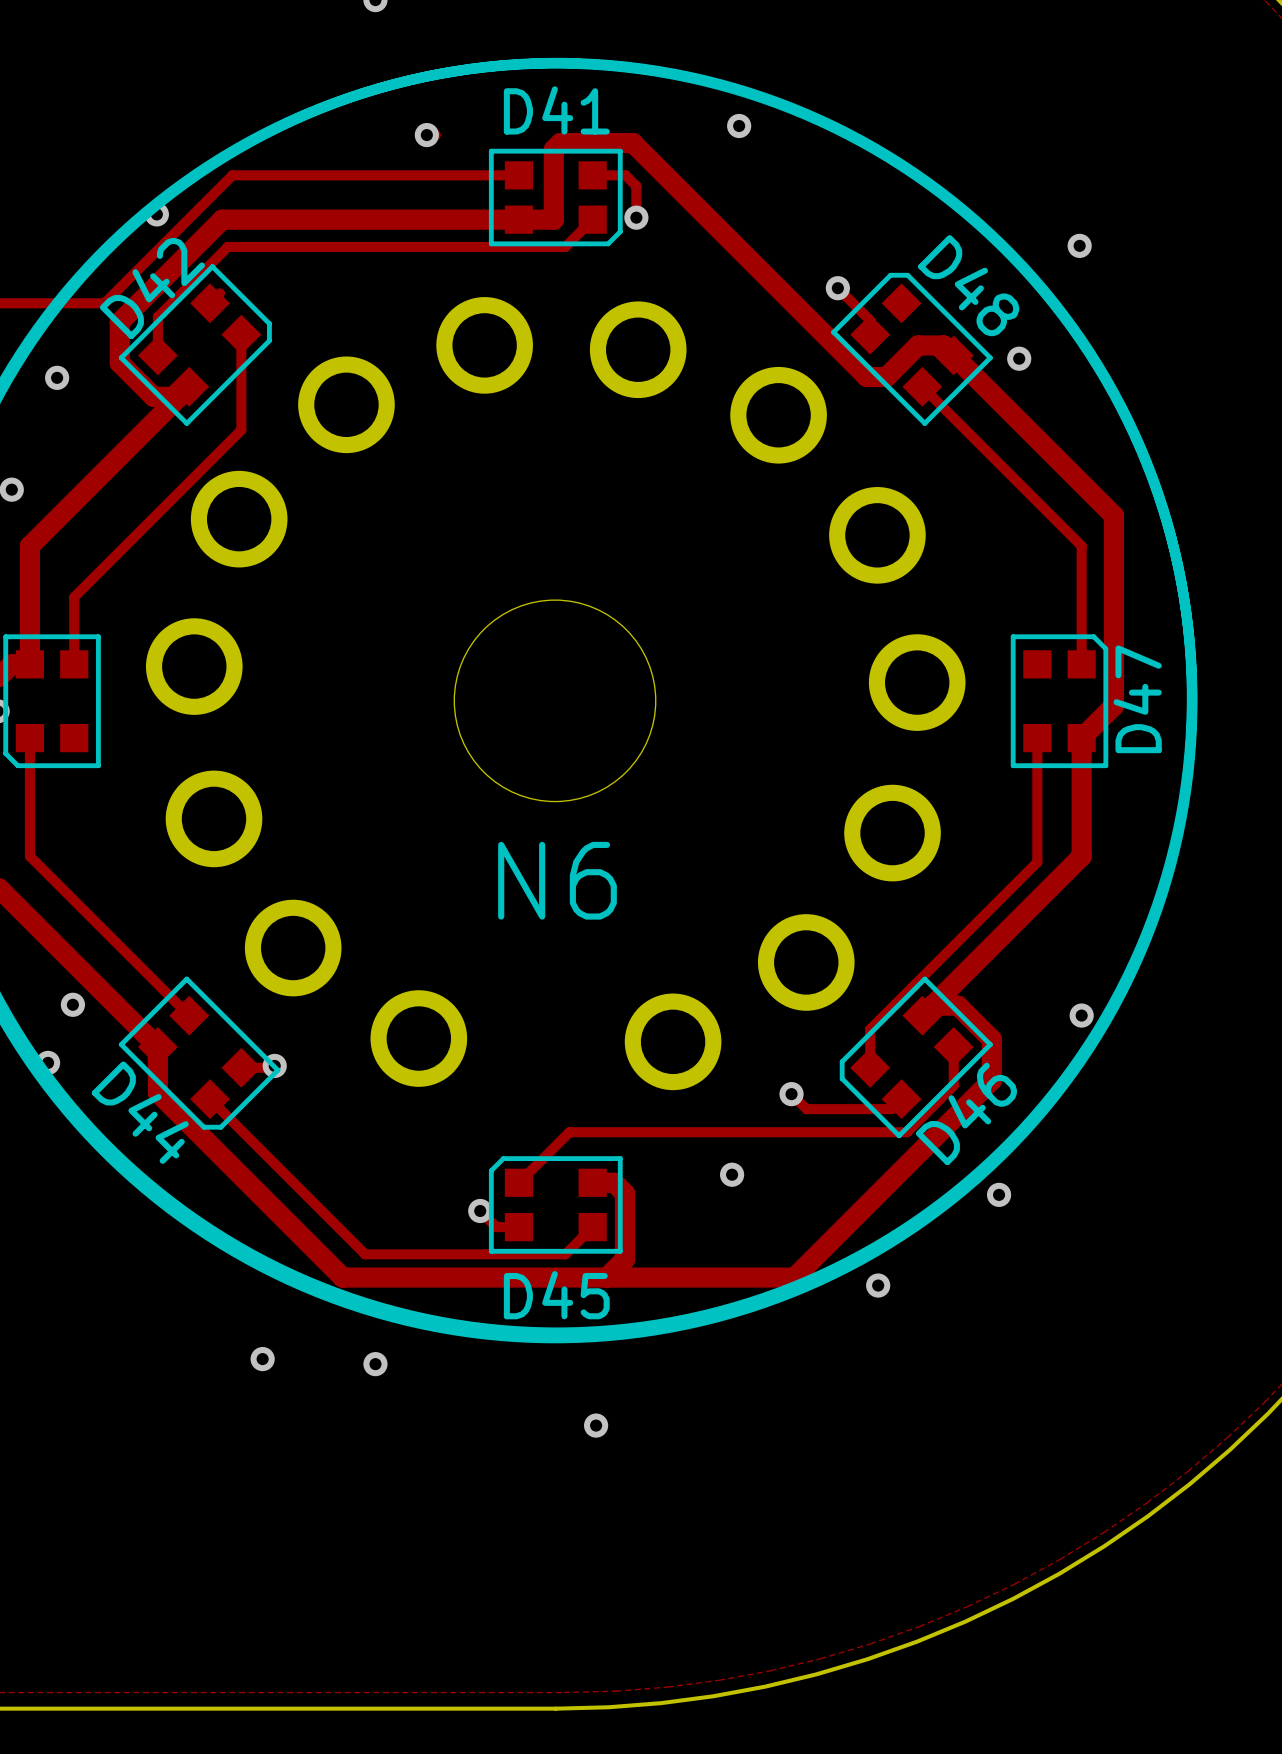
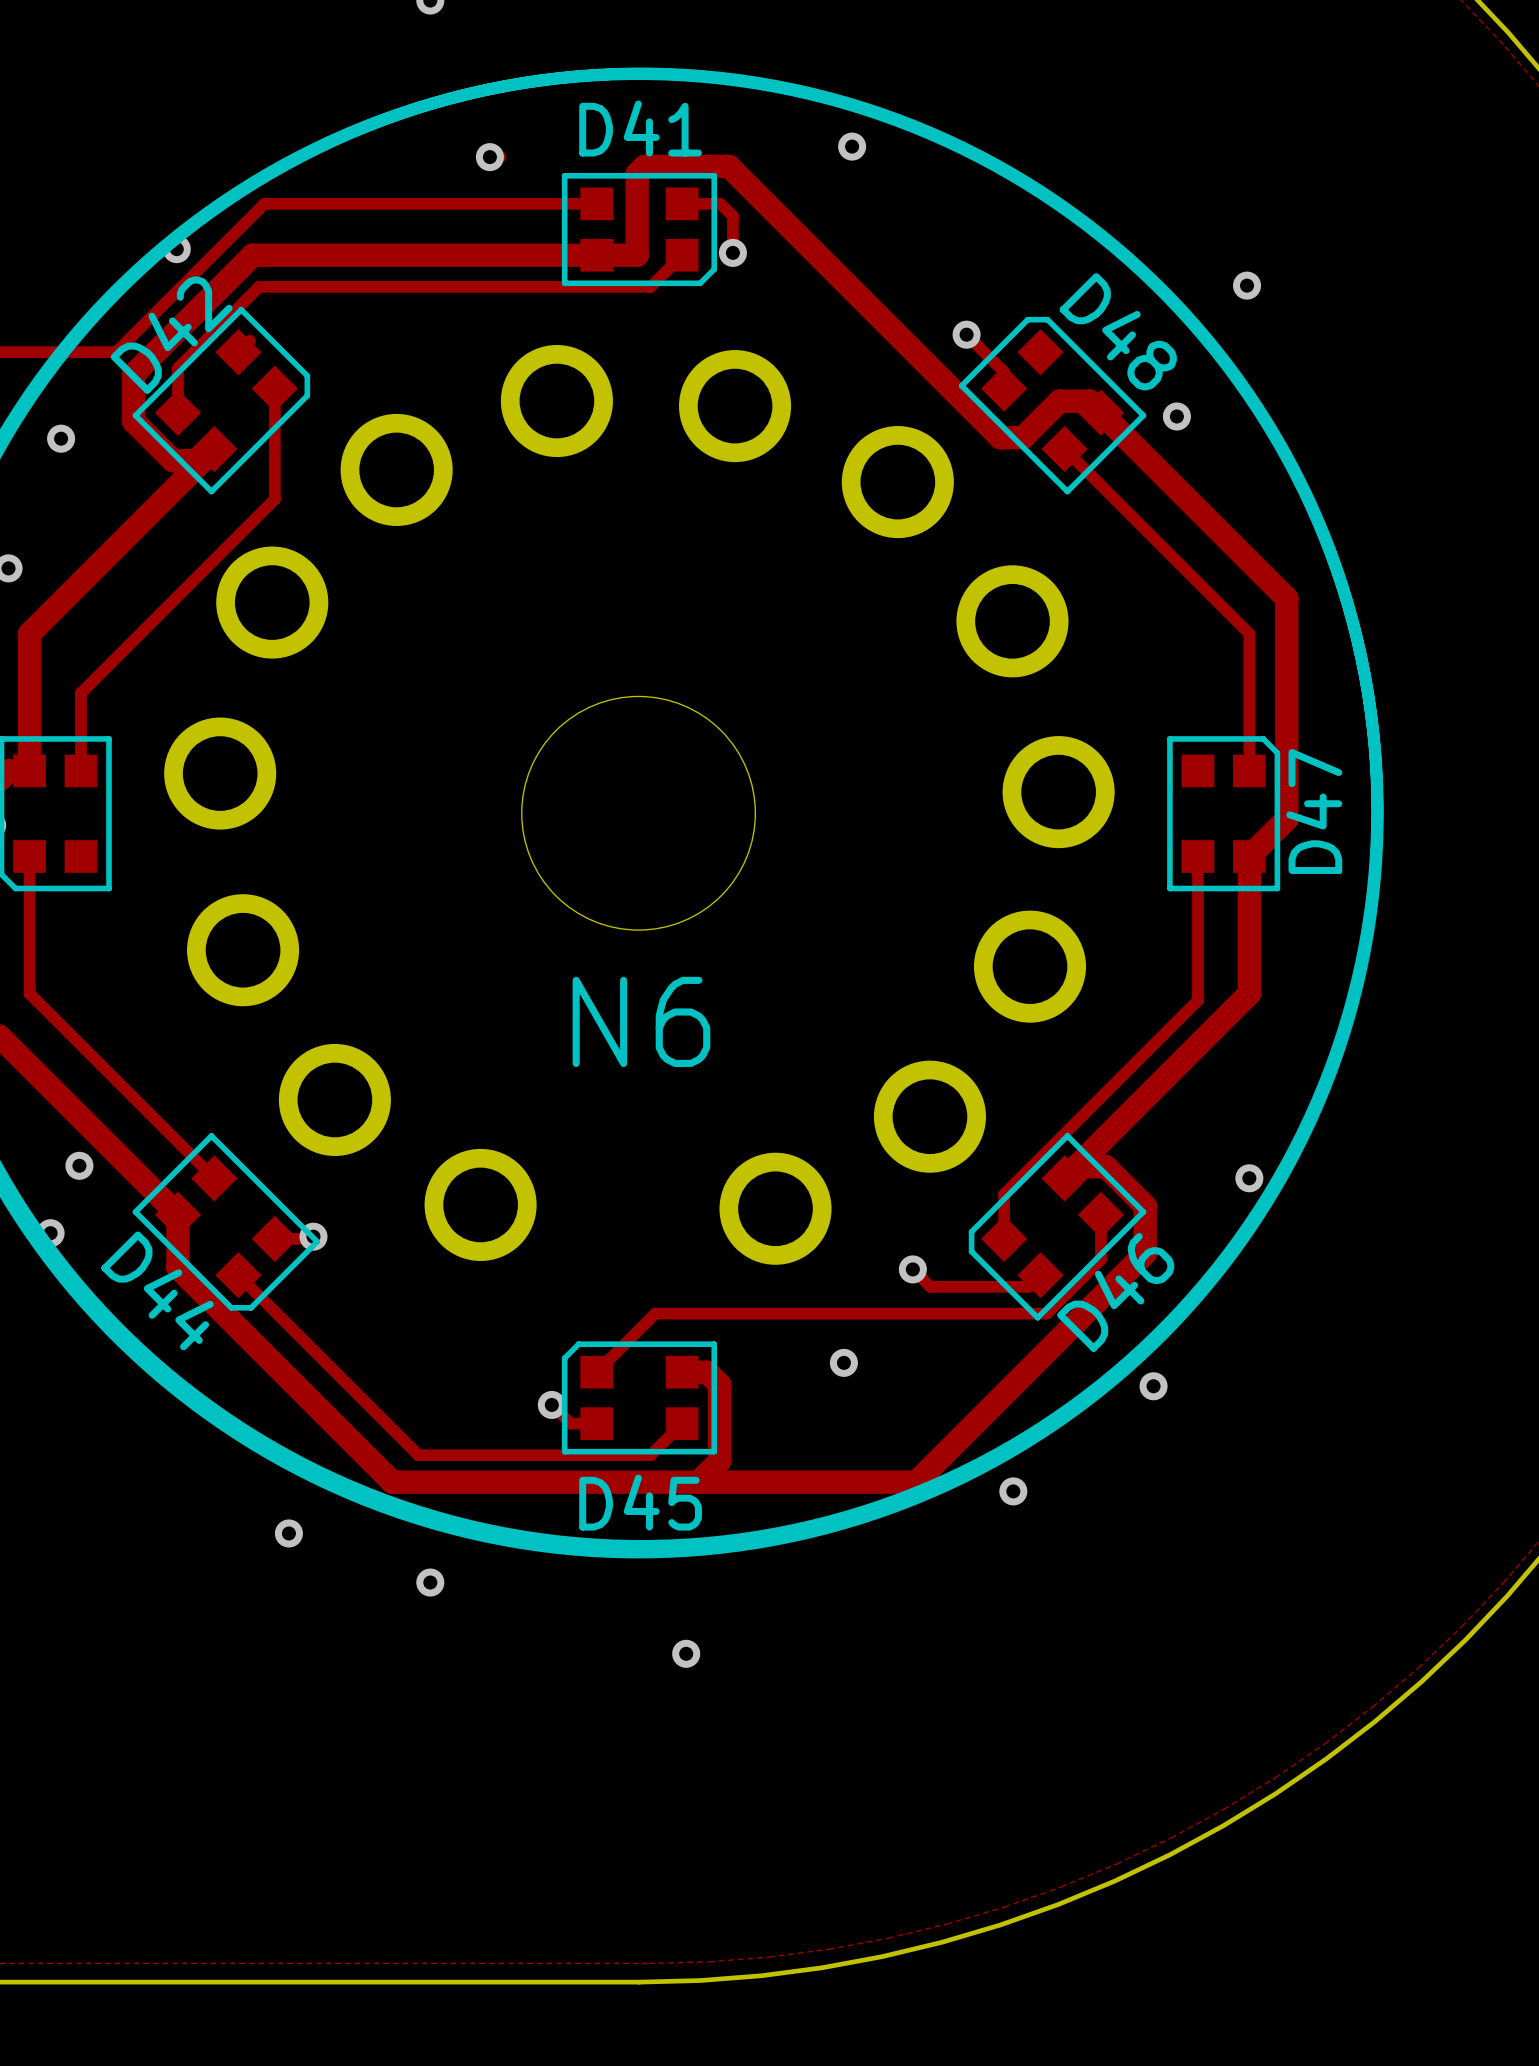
via position: (262, 1359) -> (288, 1533)

